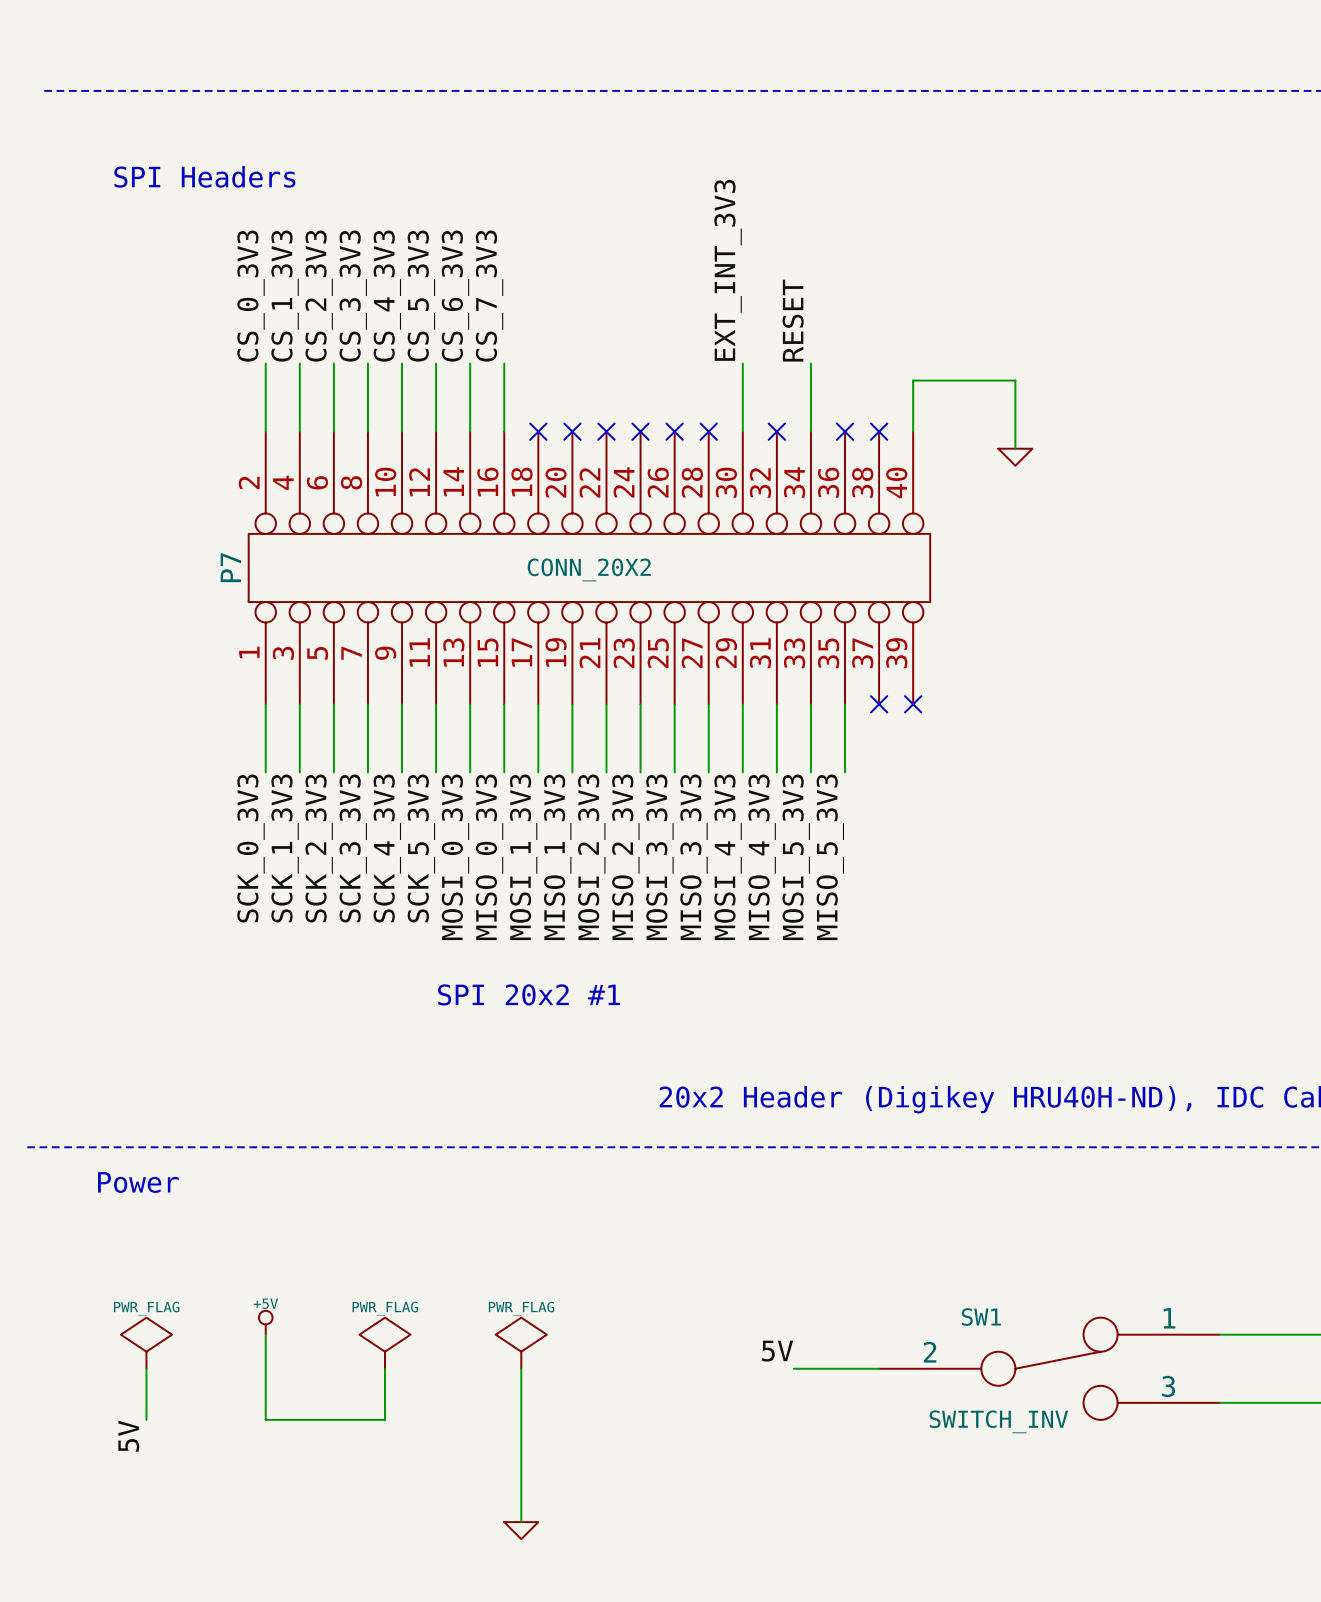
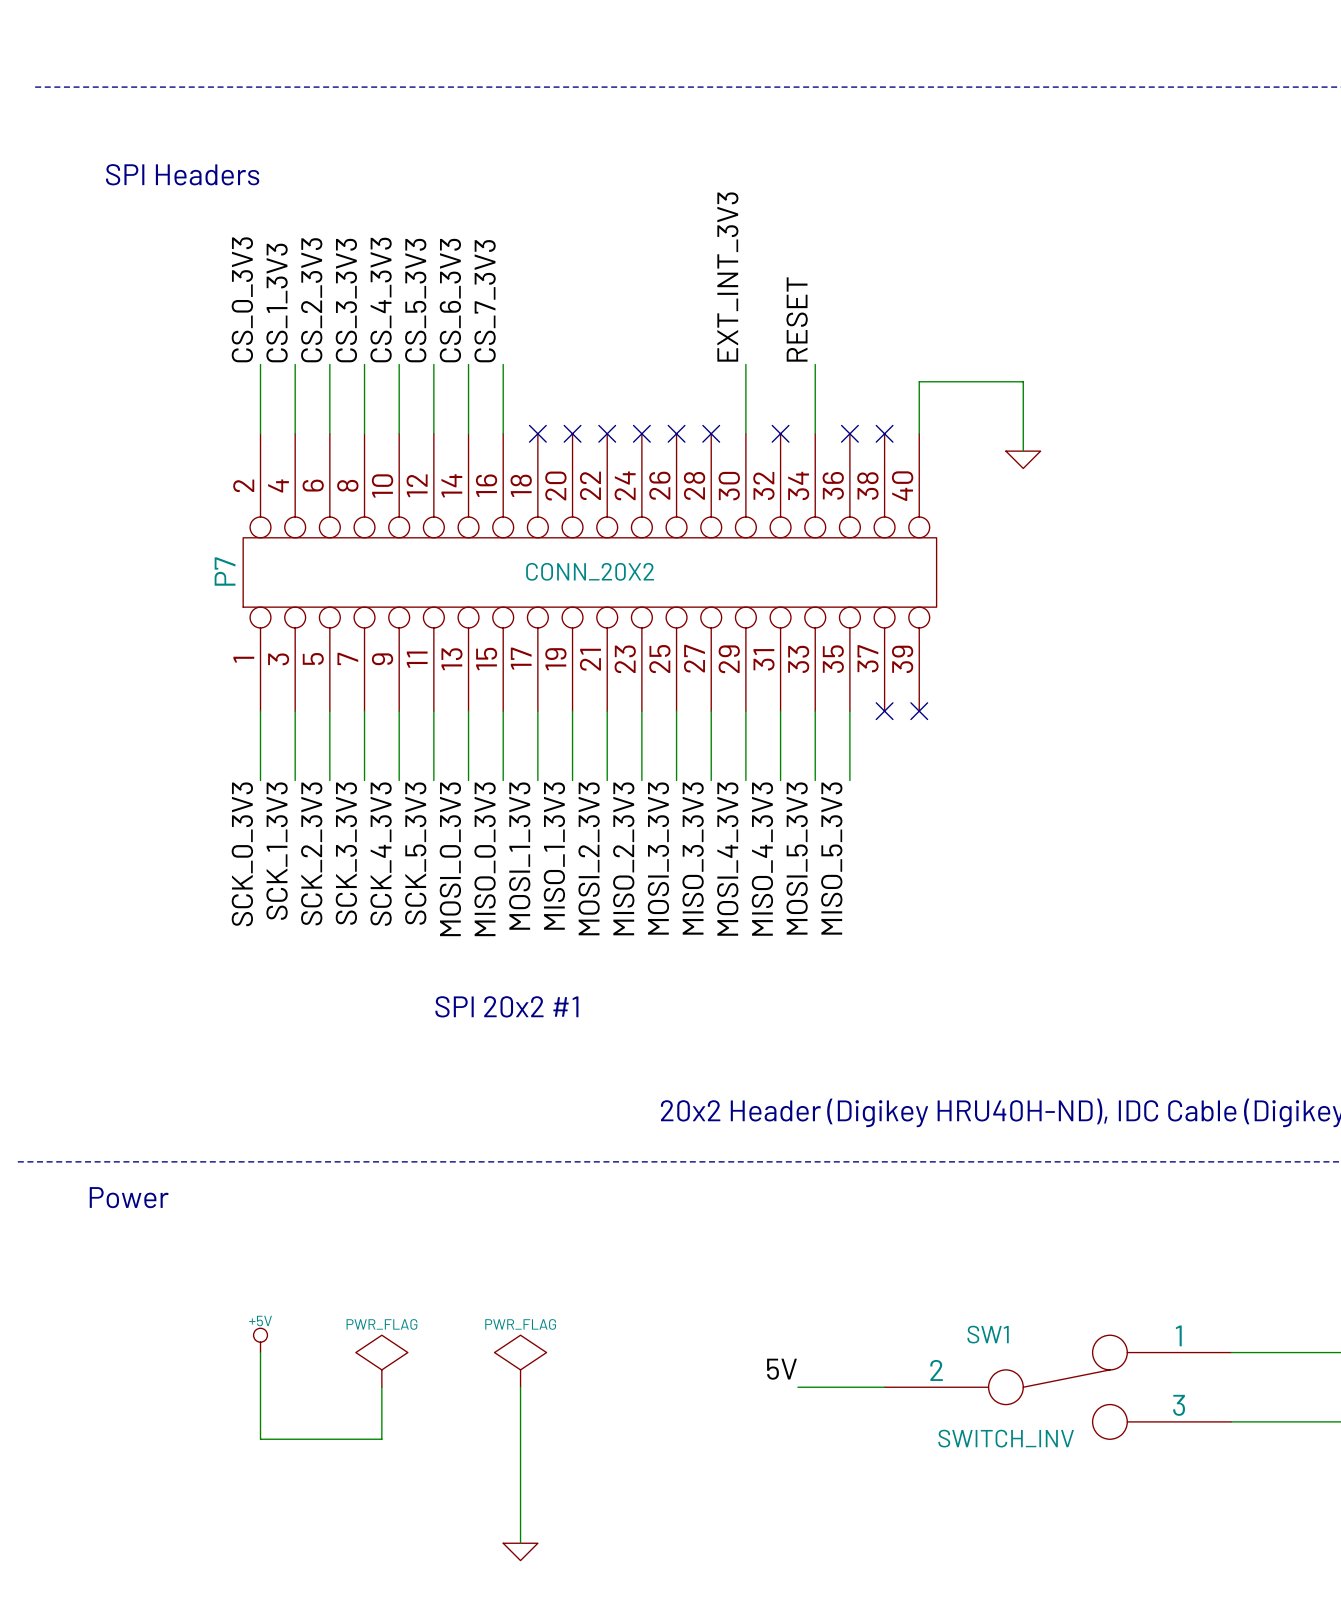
power symbol: PWR_FLAG (146, 1343) -> none
wire: (146, 1368) (146, 1419) -> none
label: 5V (128, 1436) -> none

